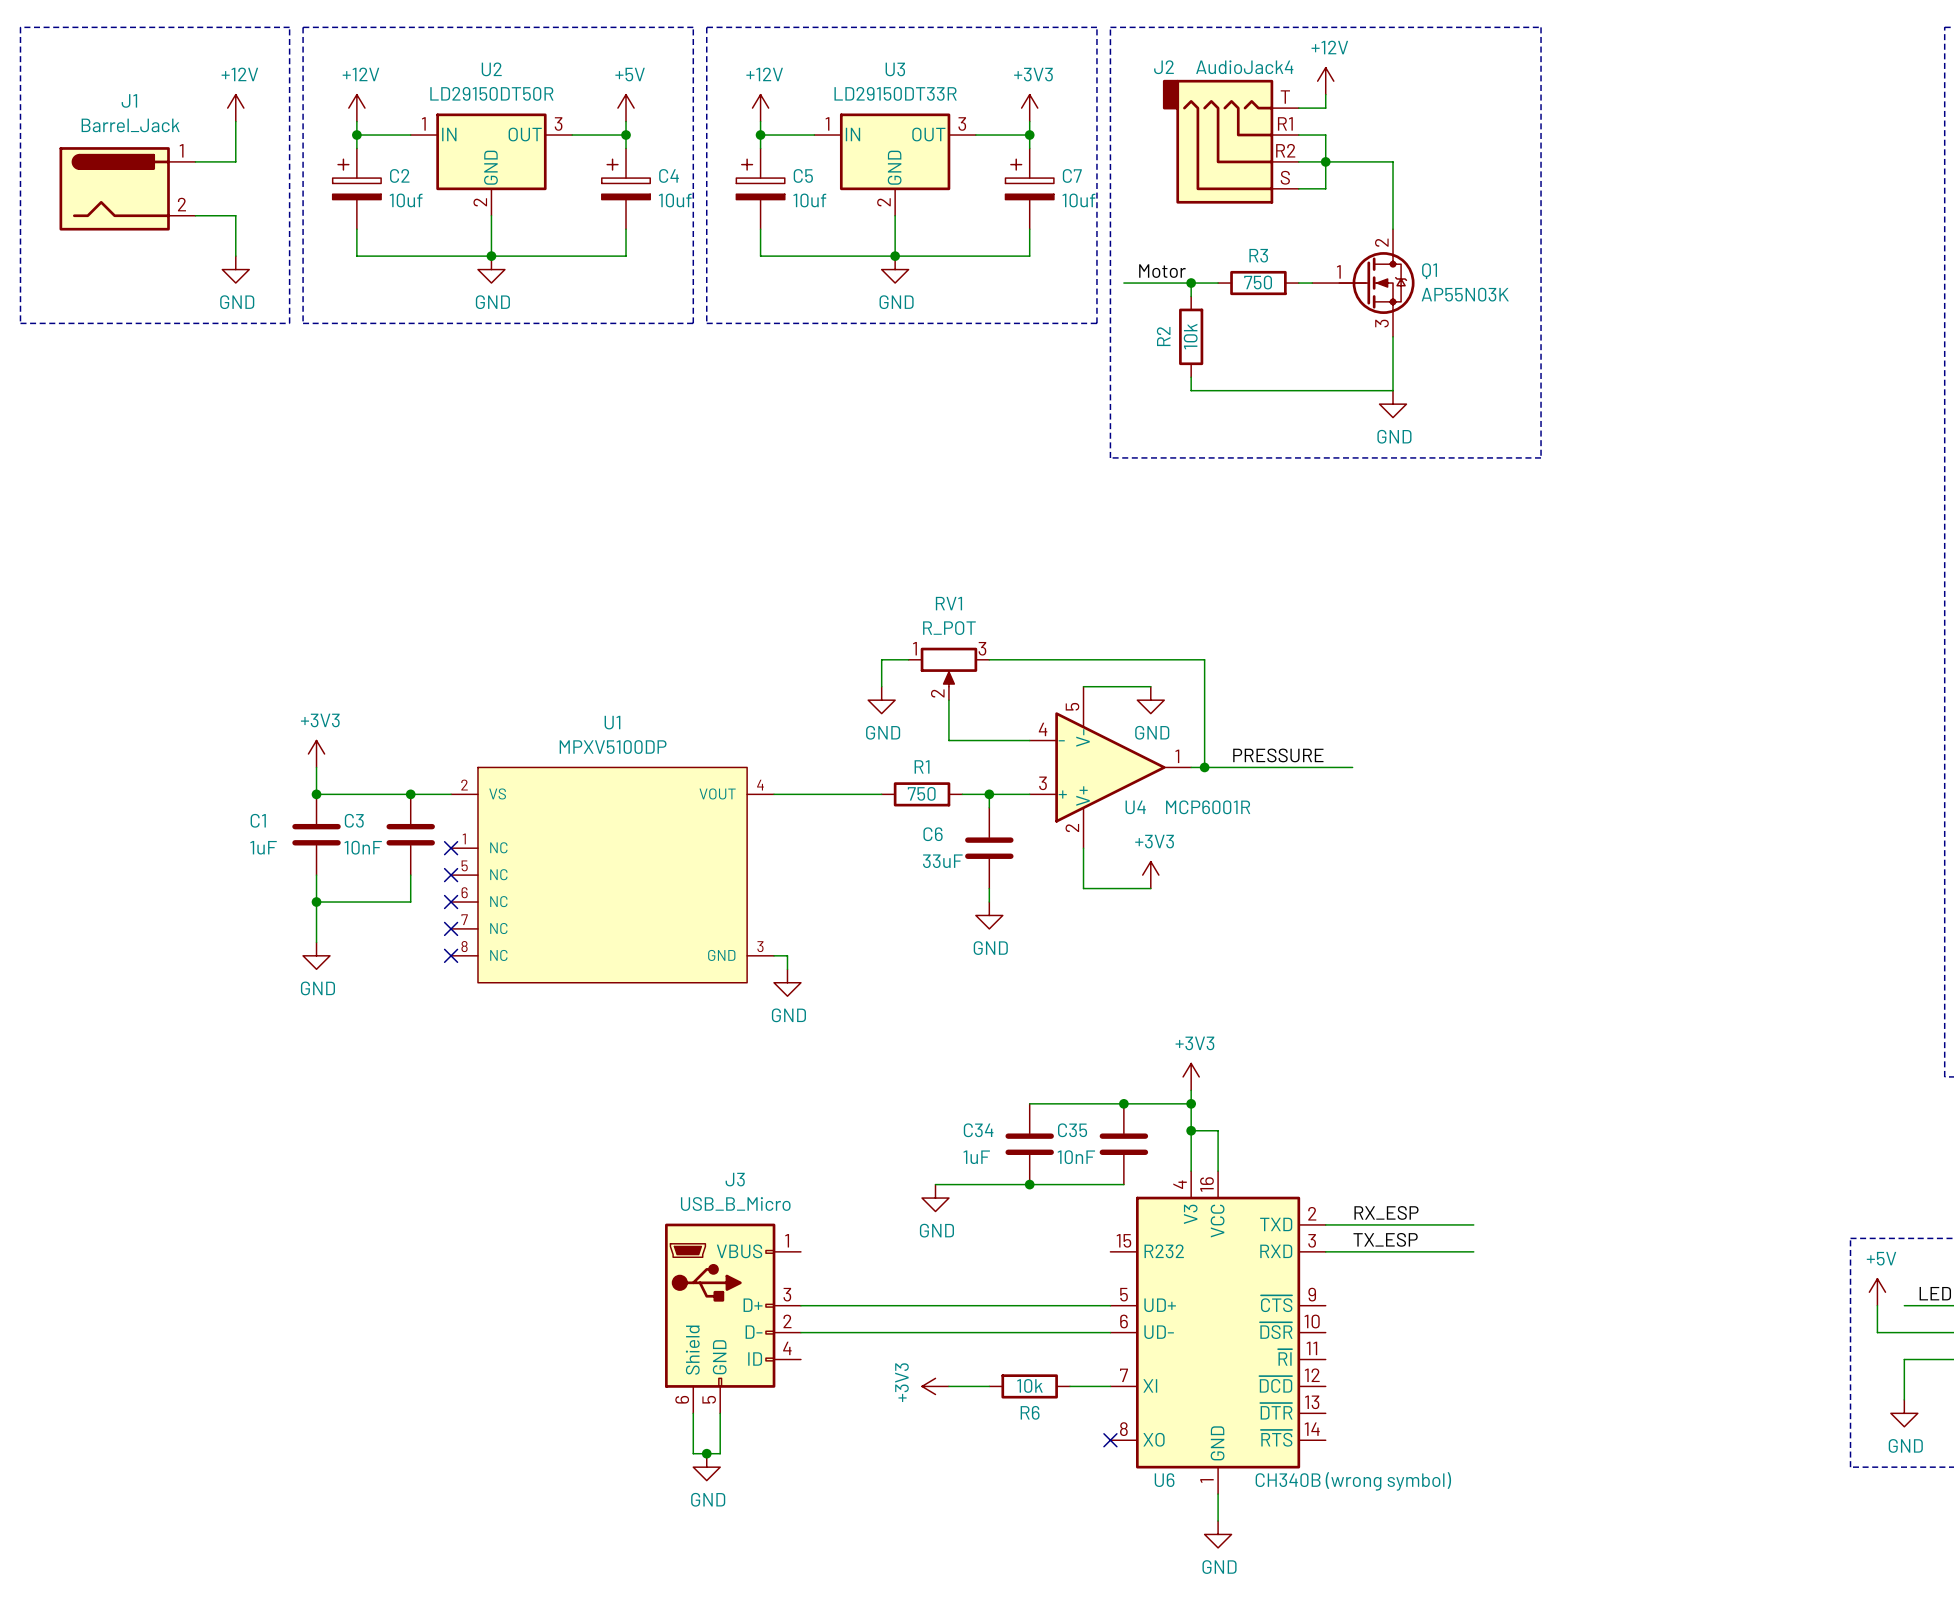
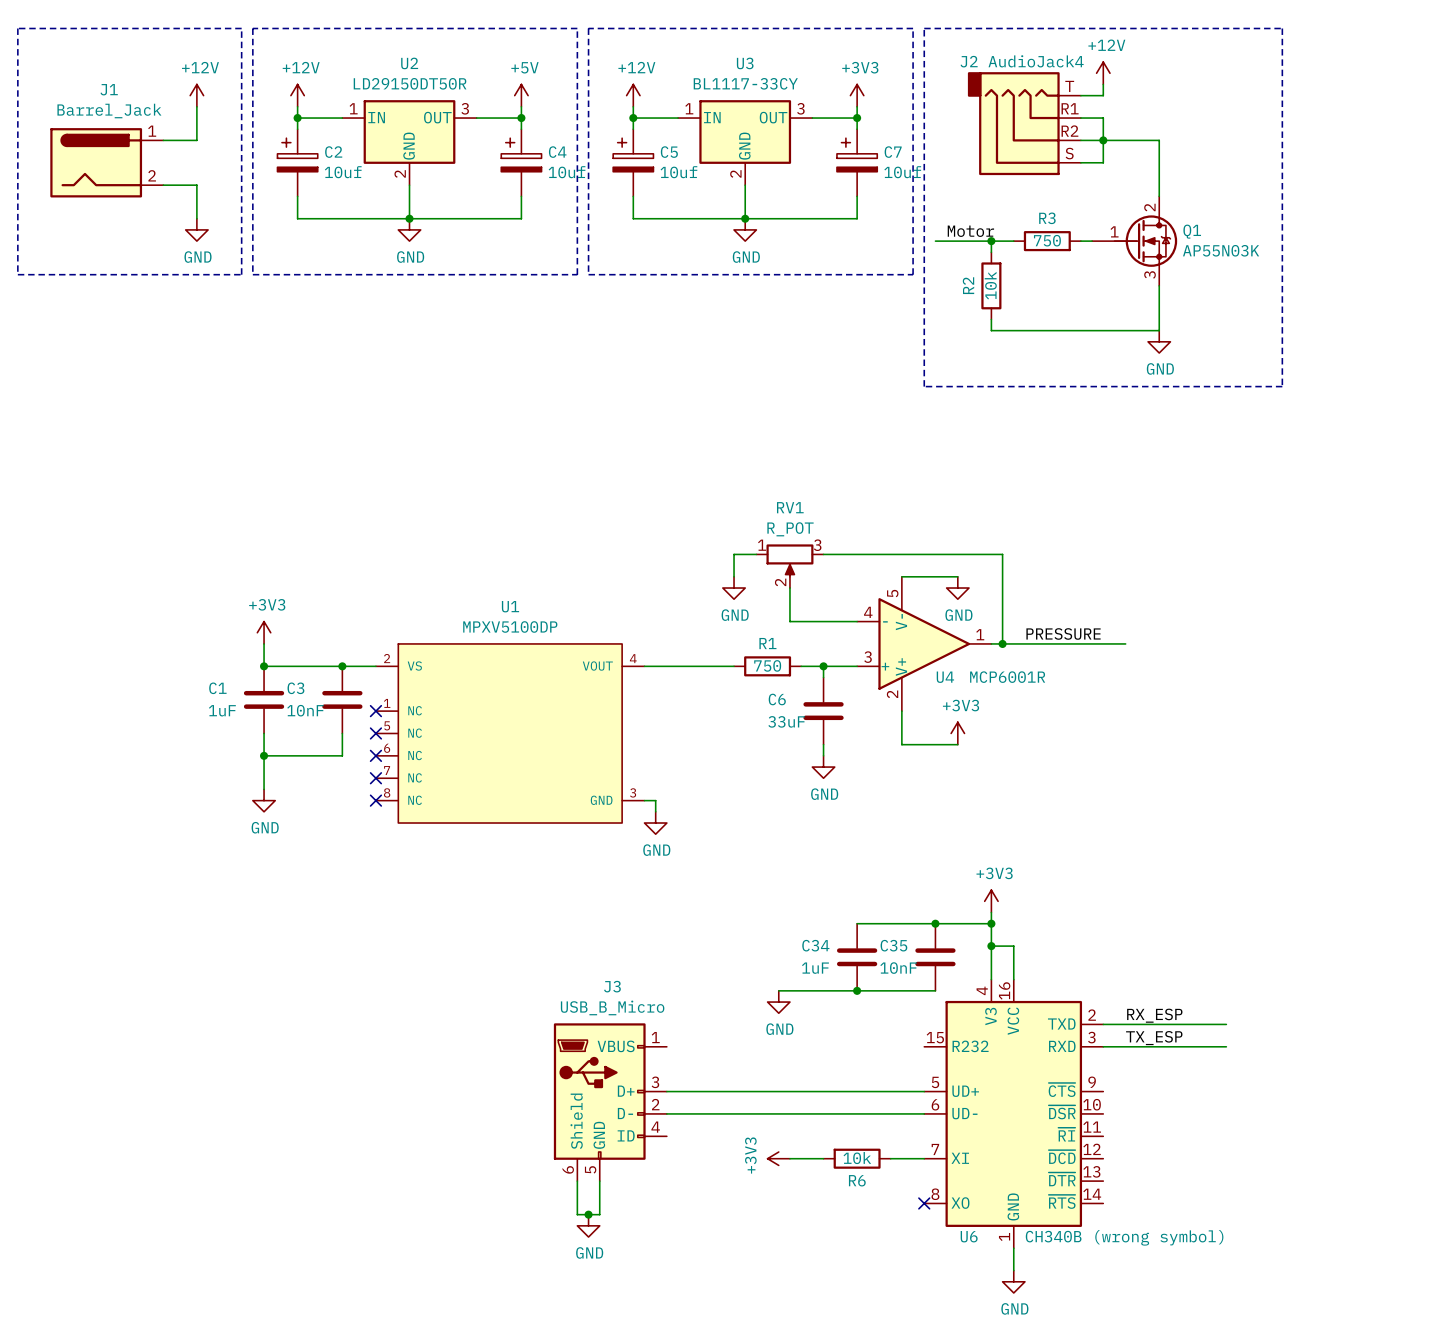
U3 value: LD29150DT33R (895, 93) -> BL1117-33CY (745, 83)

